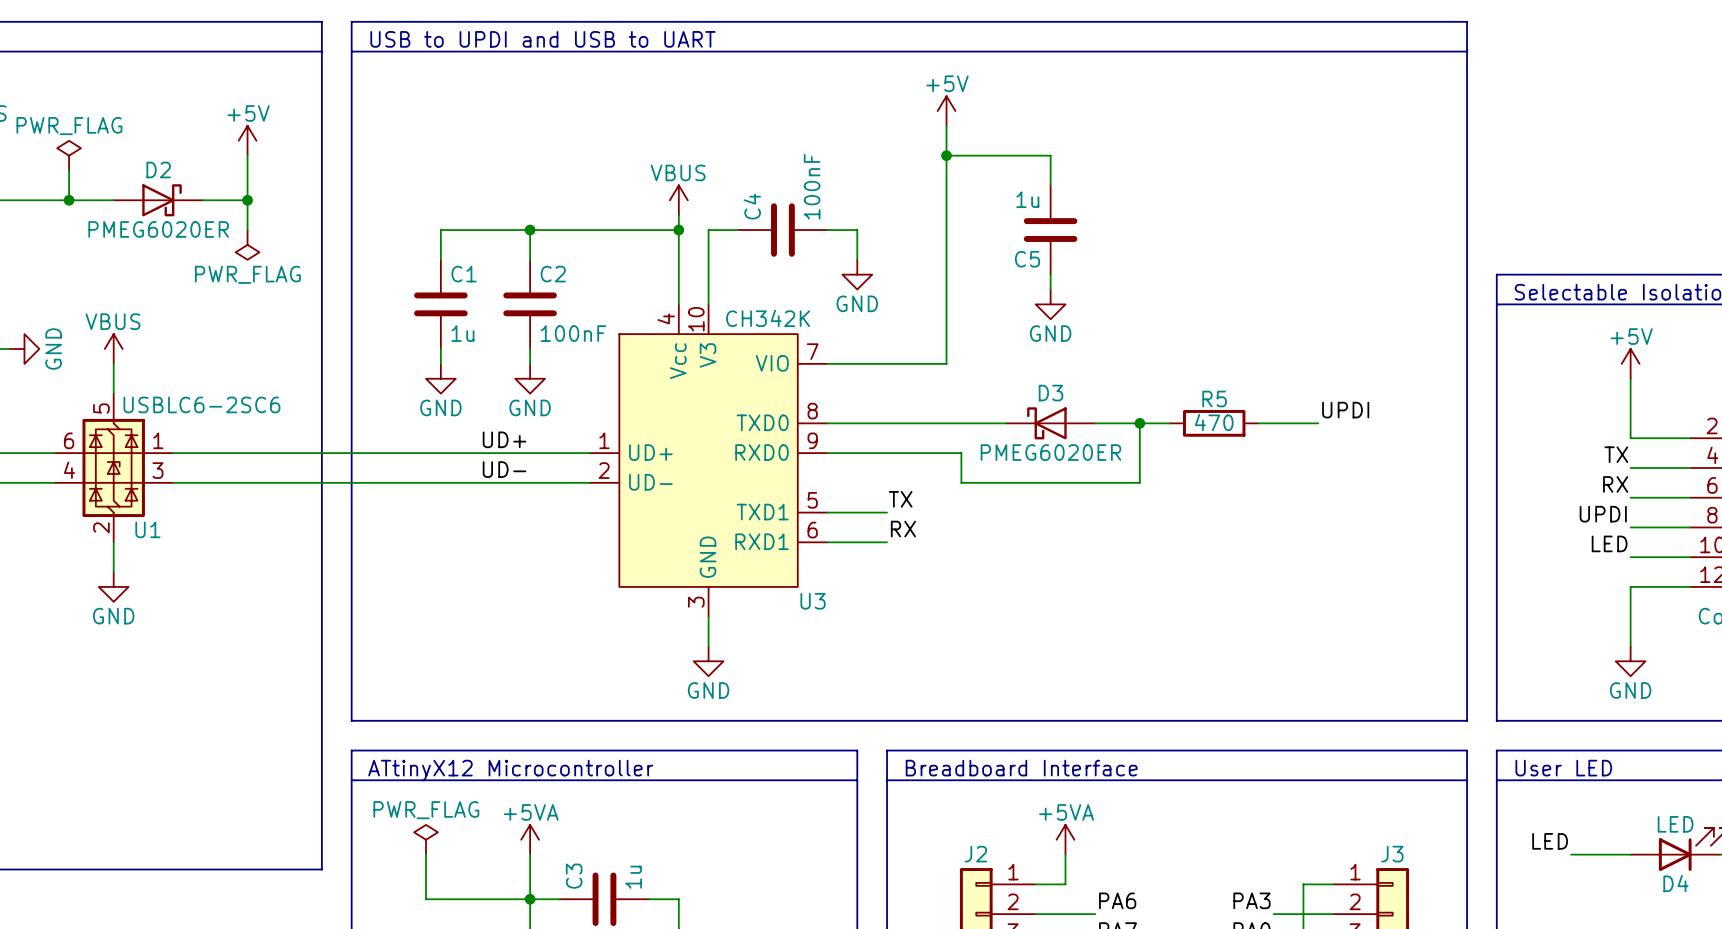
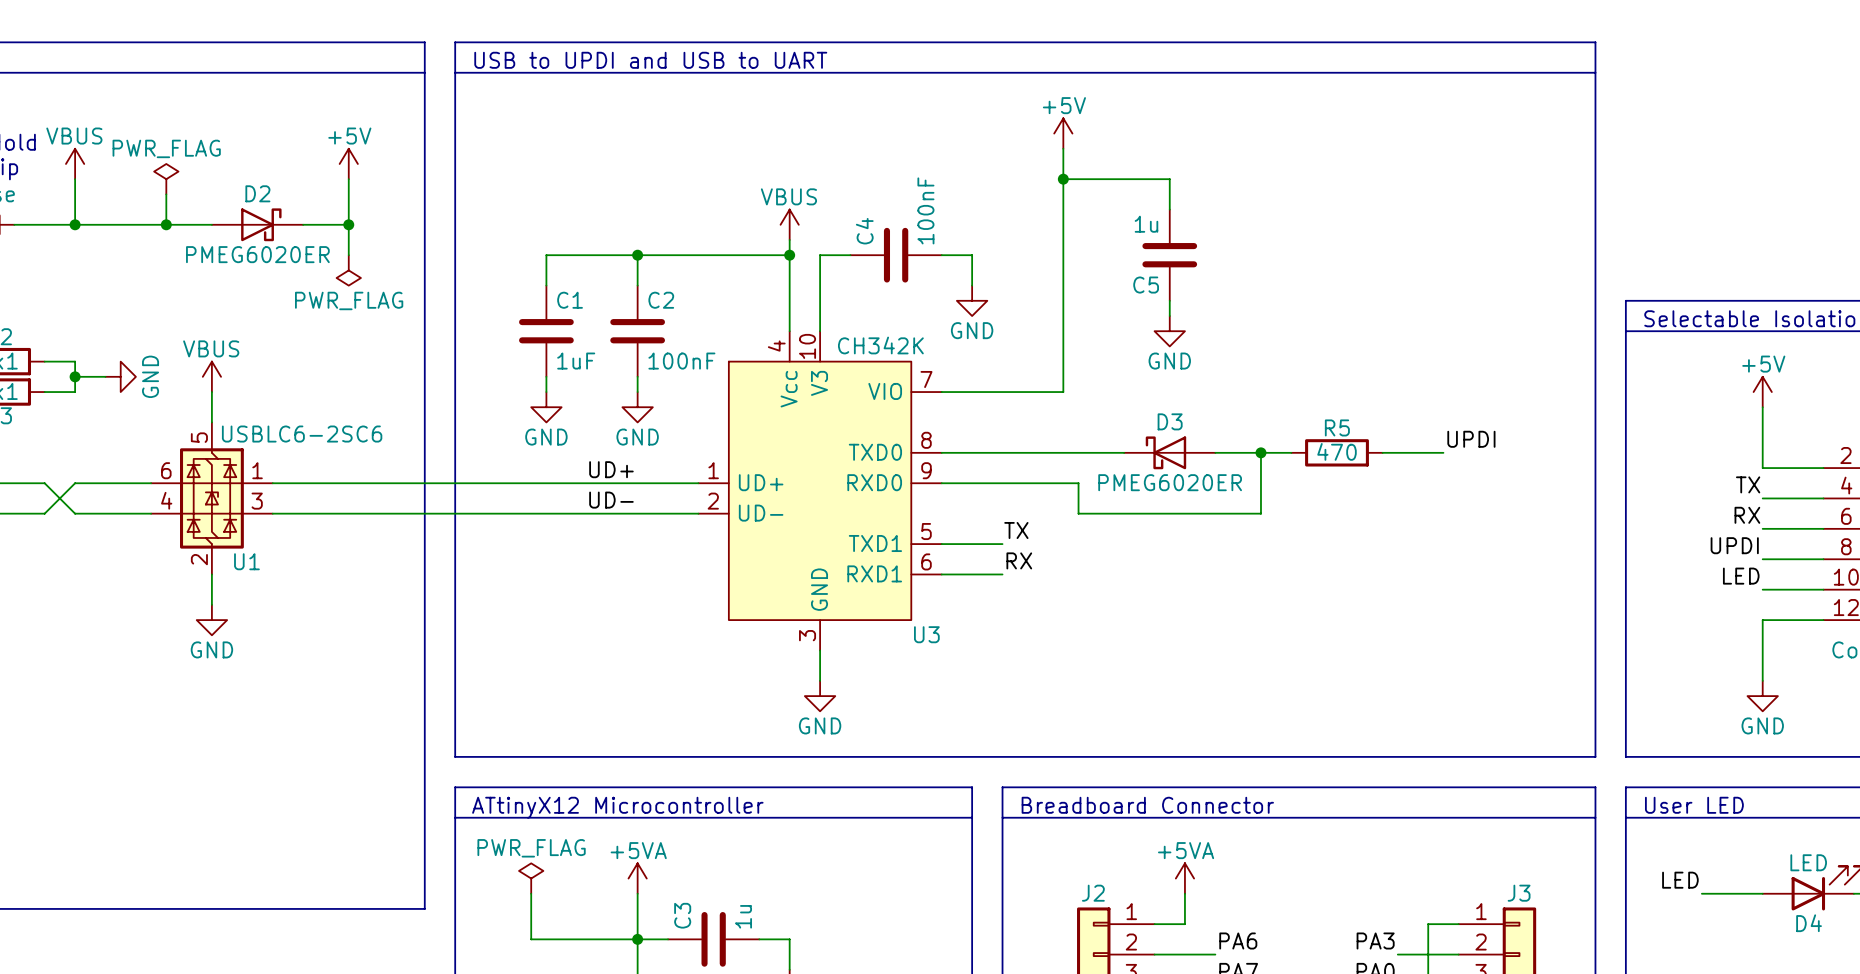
C1 value: 1u (462, 333) -> 1uF (576, 361)
text: Breadboard Interface (1021, 768) -> Breadboard Connector (1147, 805)

